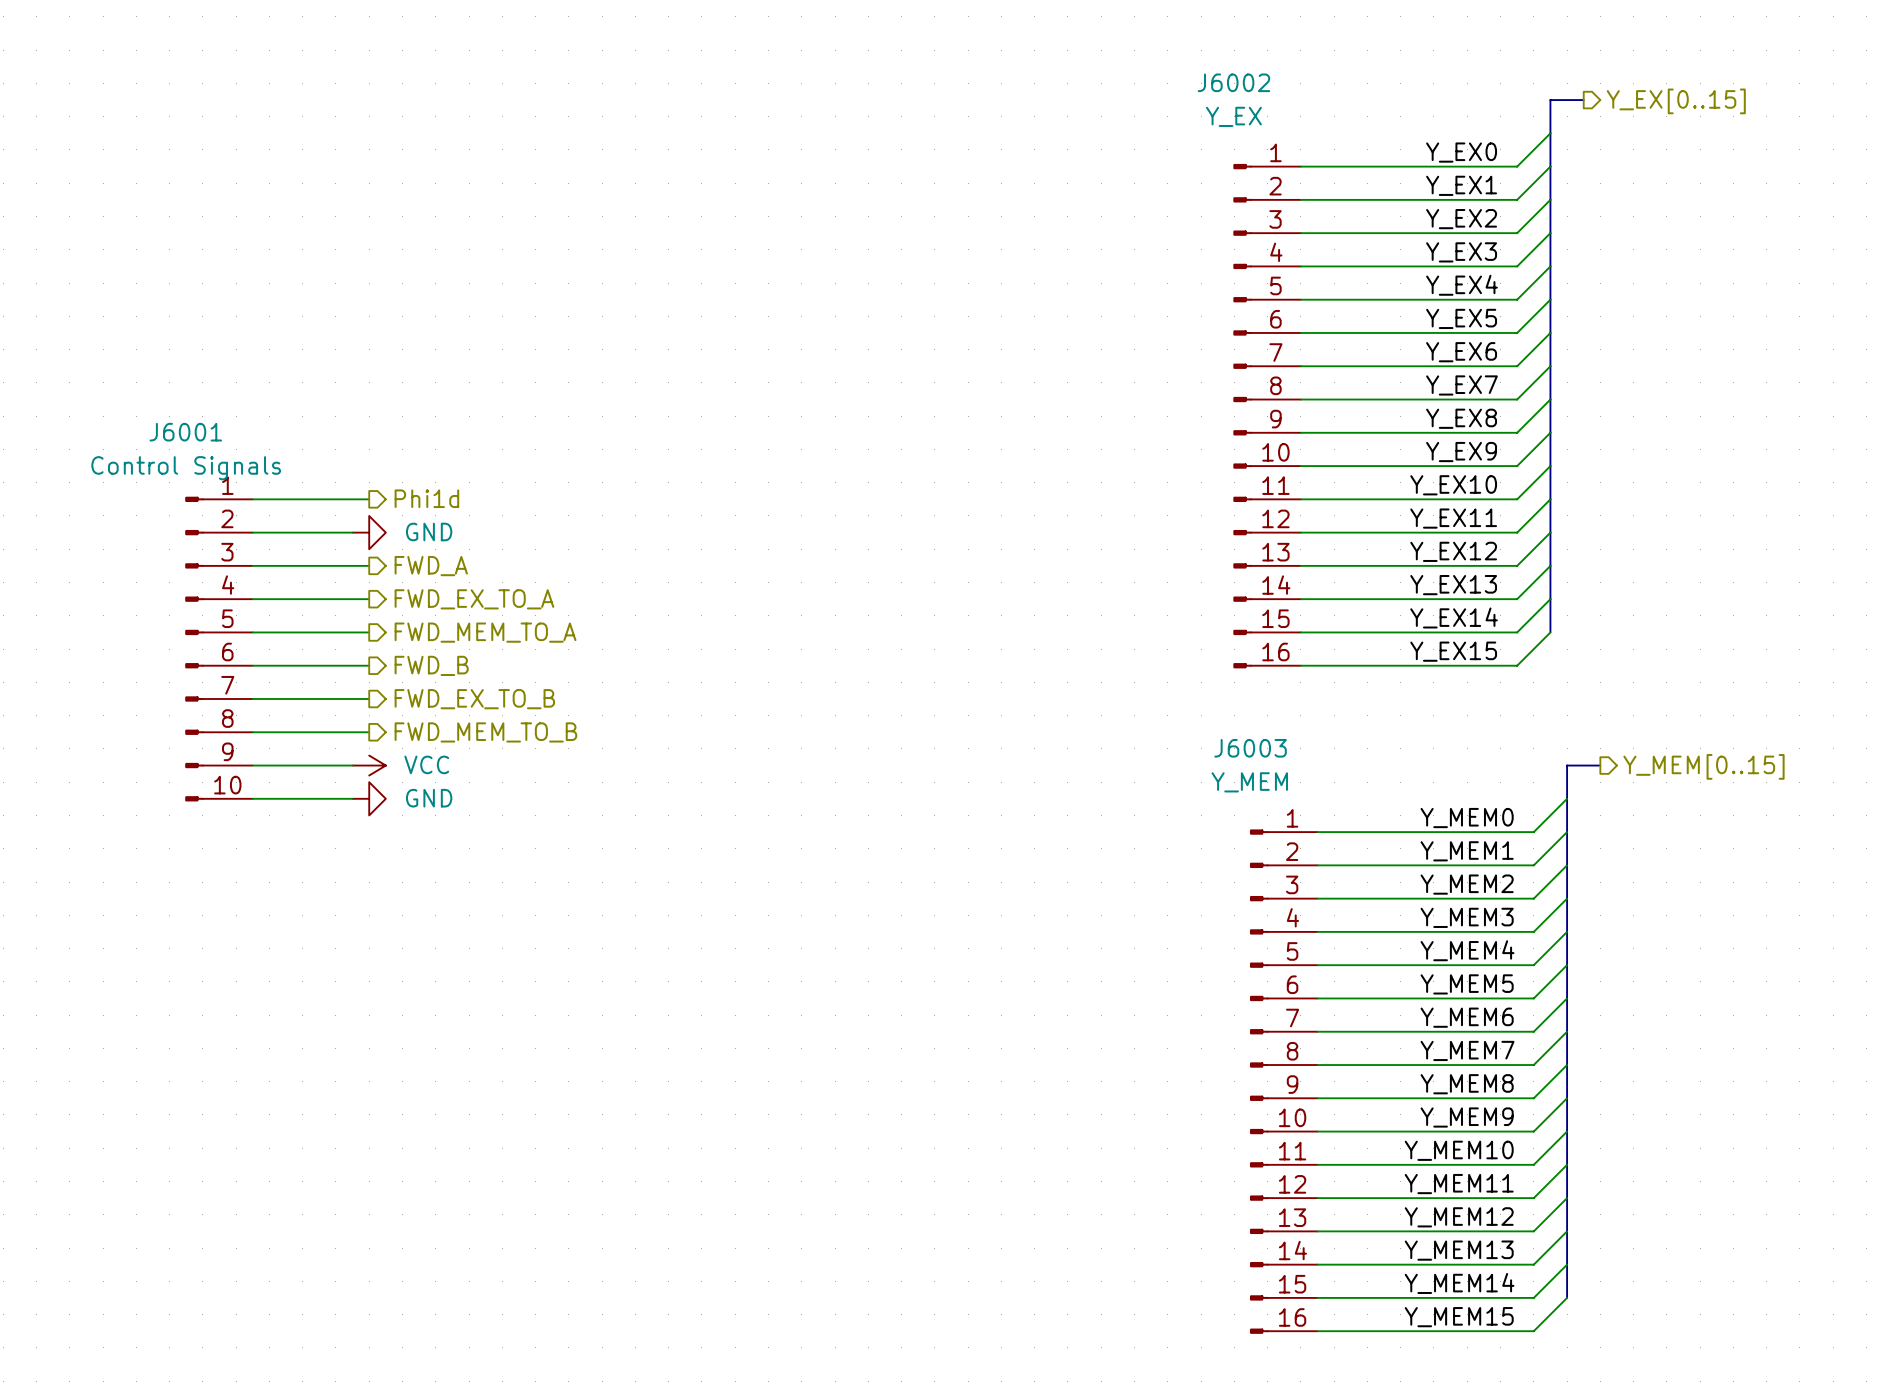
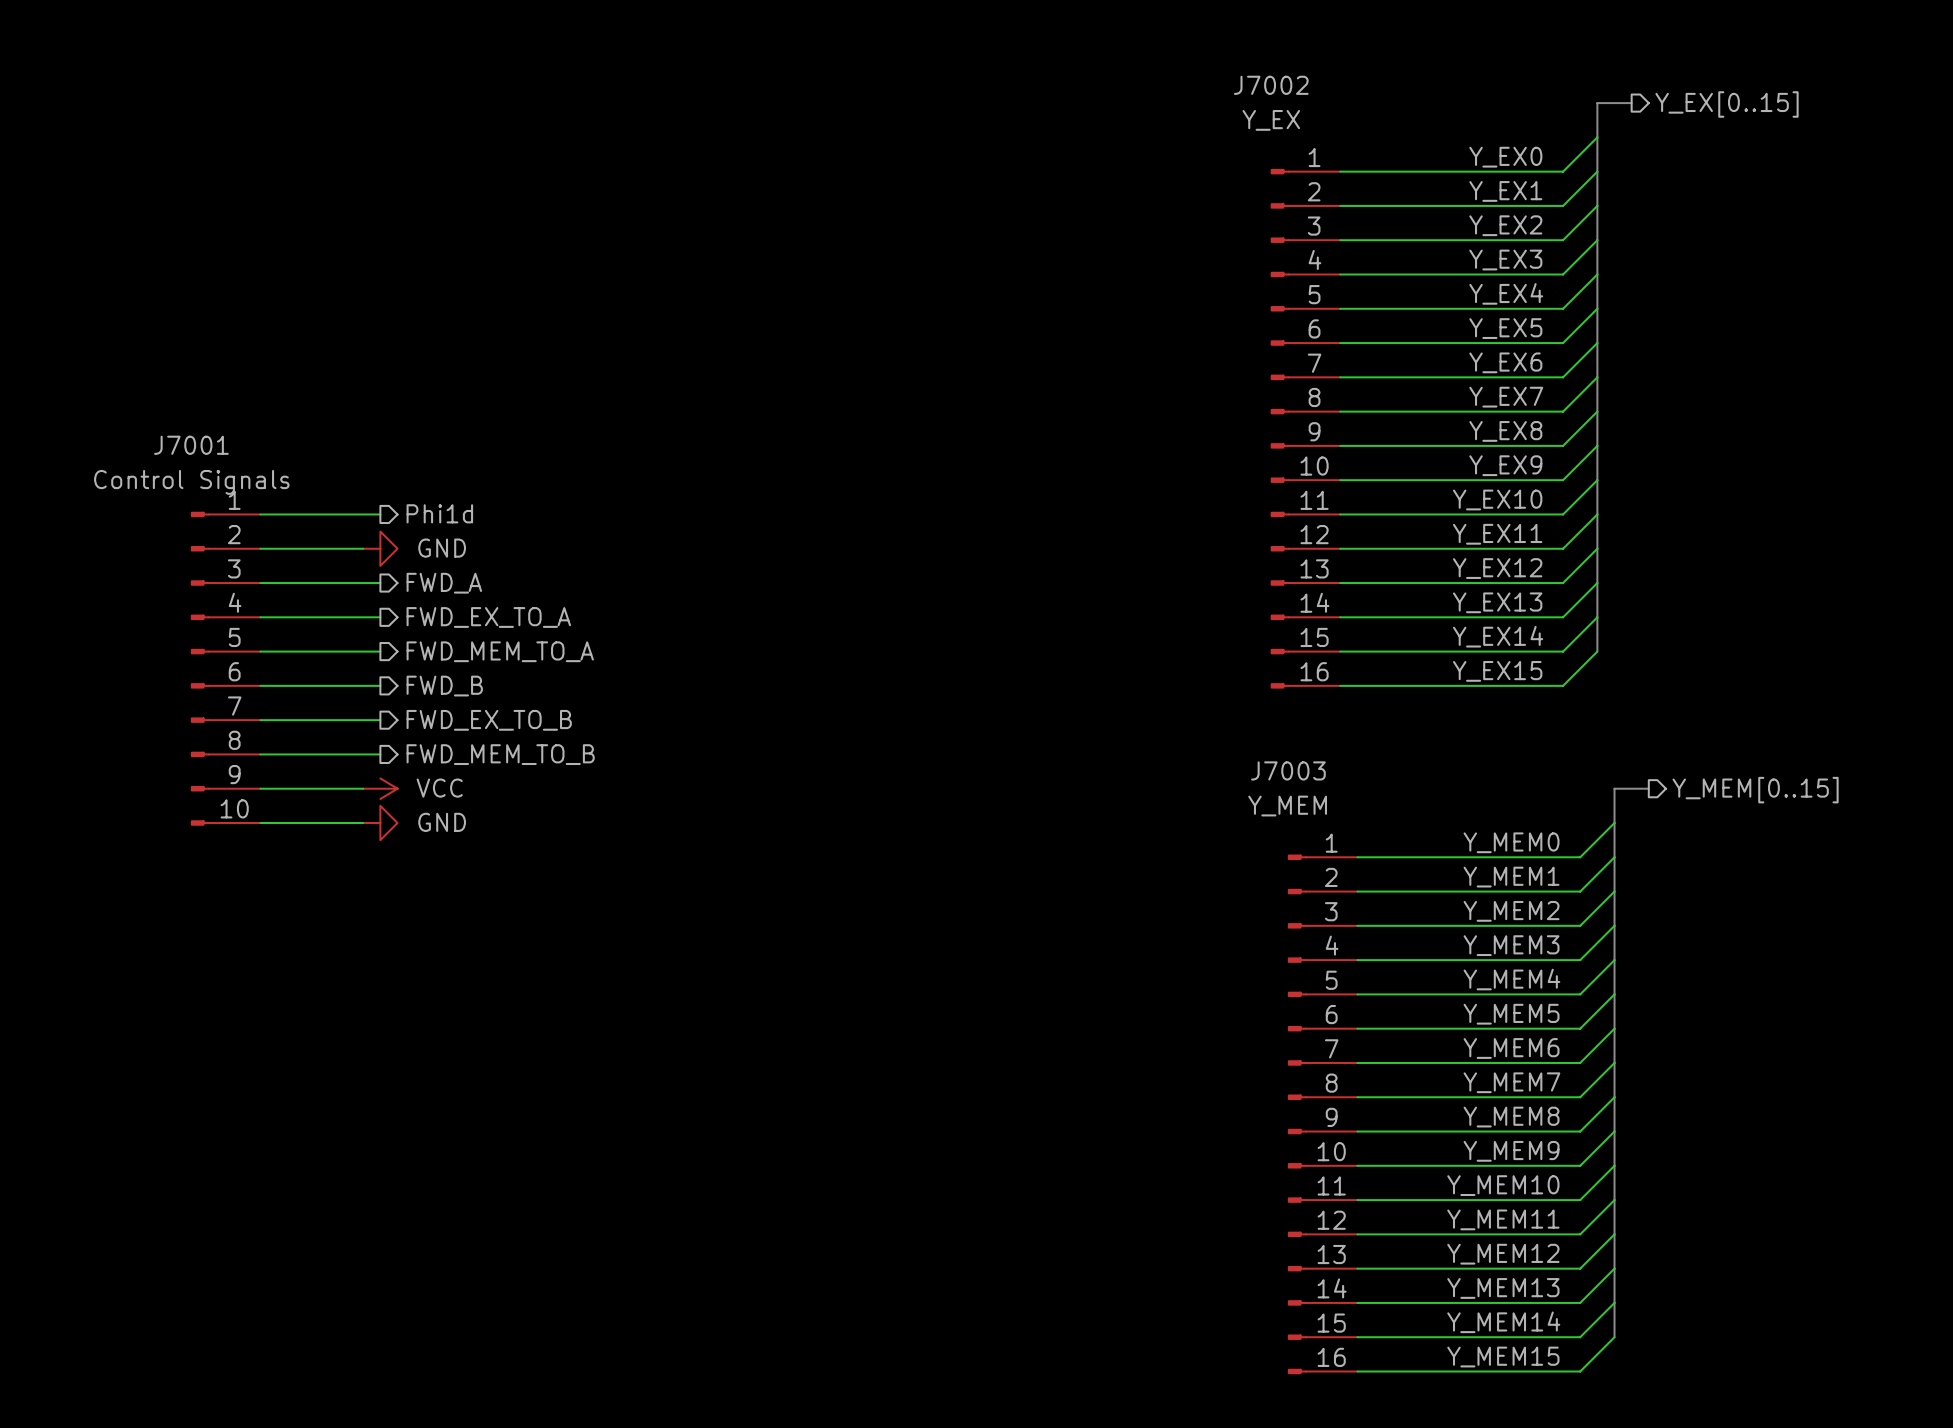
J6002 name: J6002 (1233, 82) -> J7002 (1271, 85)
J6001 name: J6001 (185, 432) -> J7001 (191, 445)
J6003 name: J6003 (1250, 748) -> J7003 (1288, 770)

